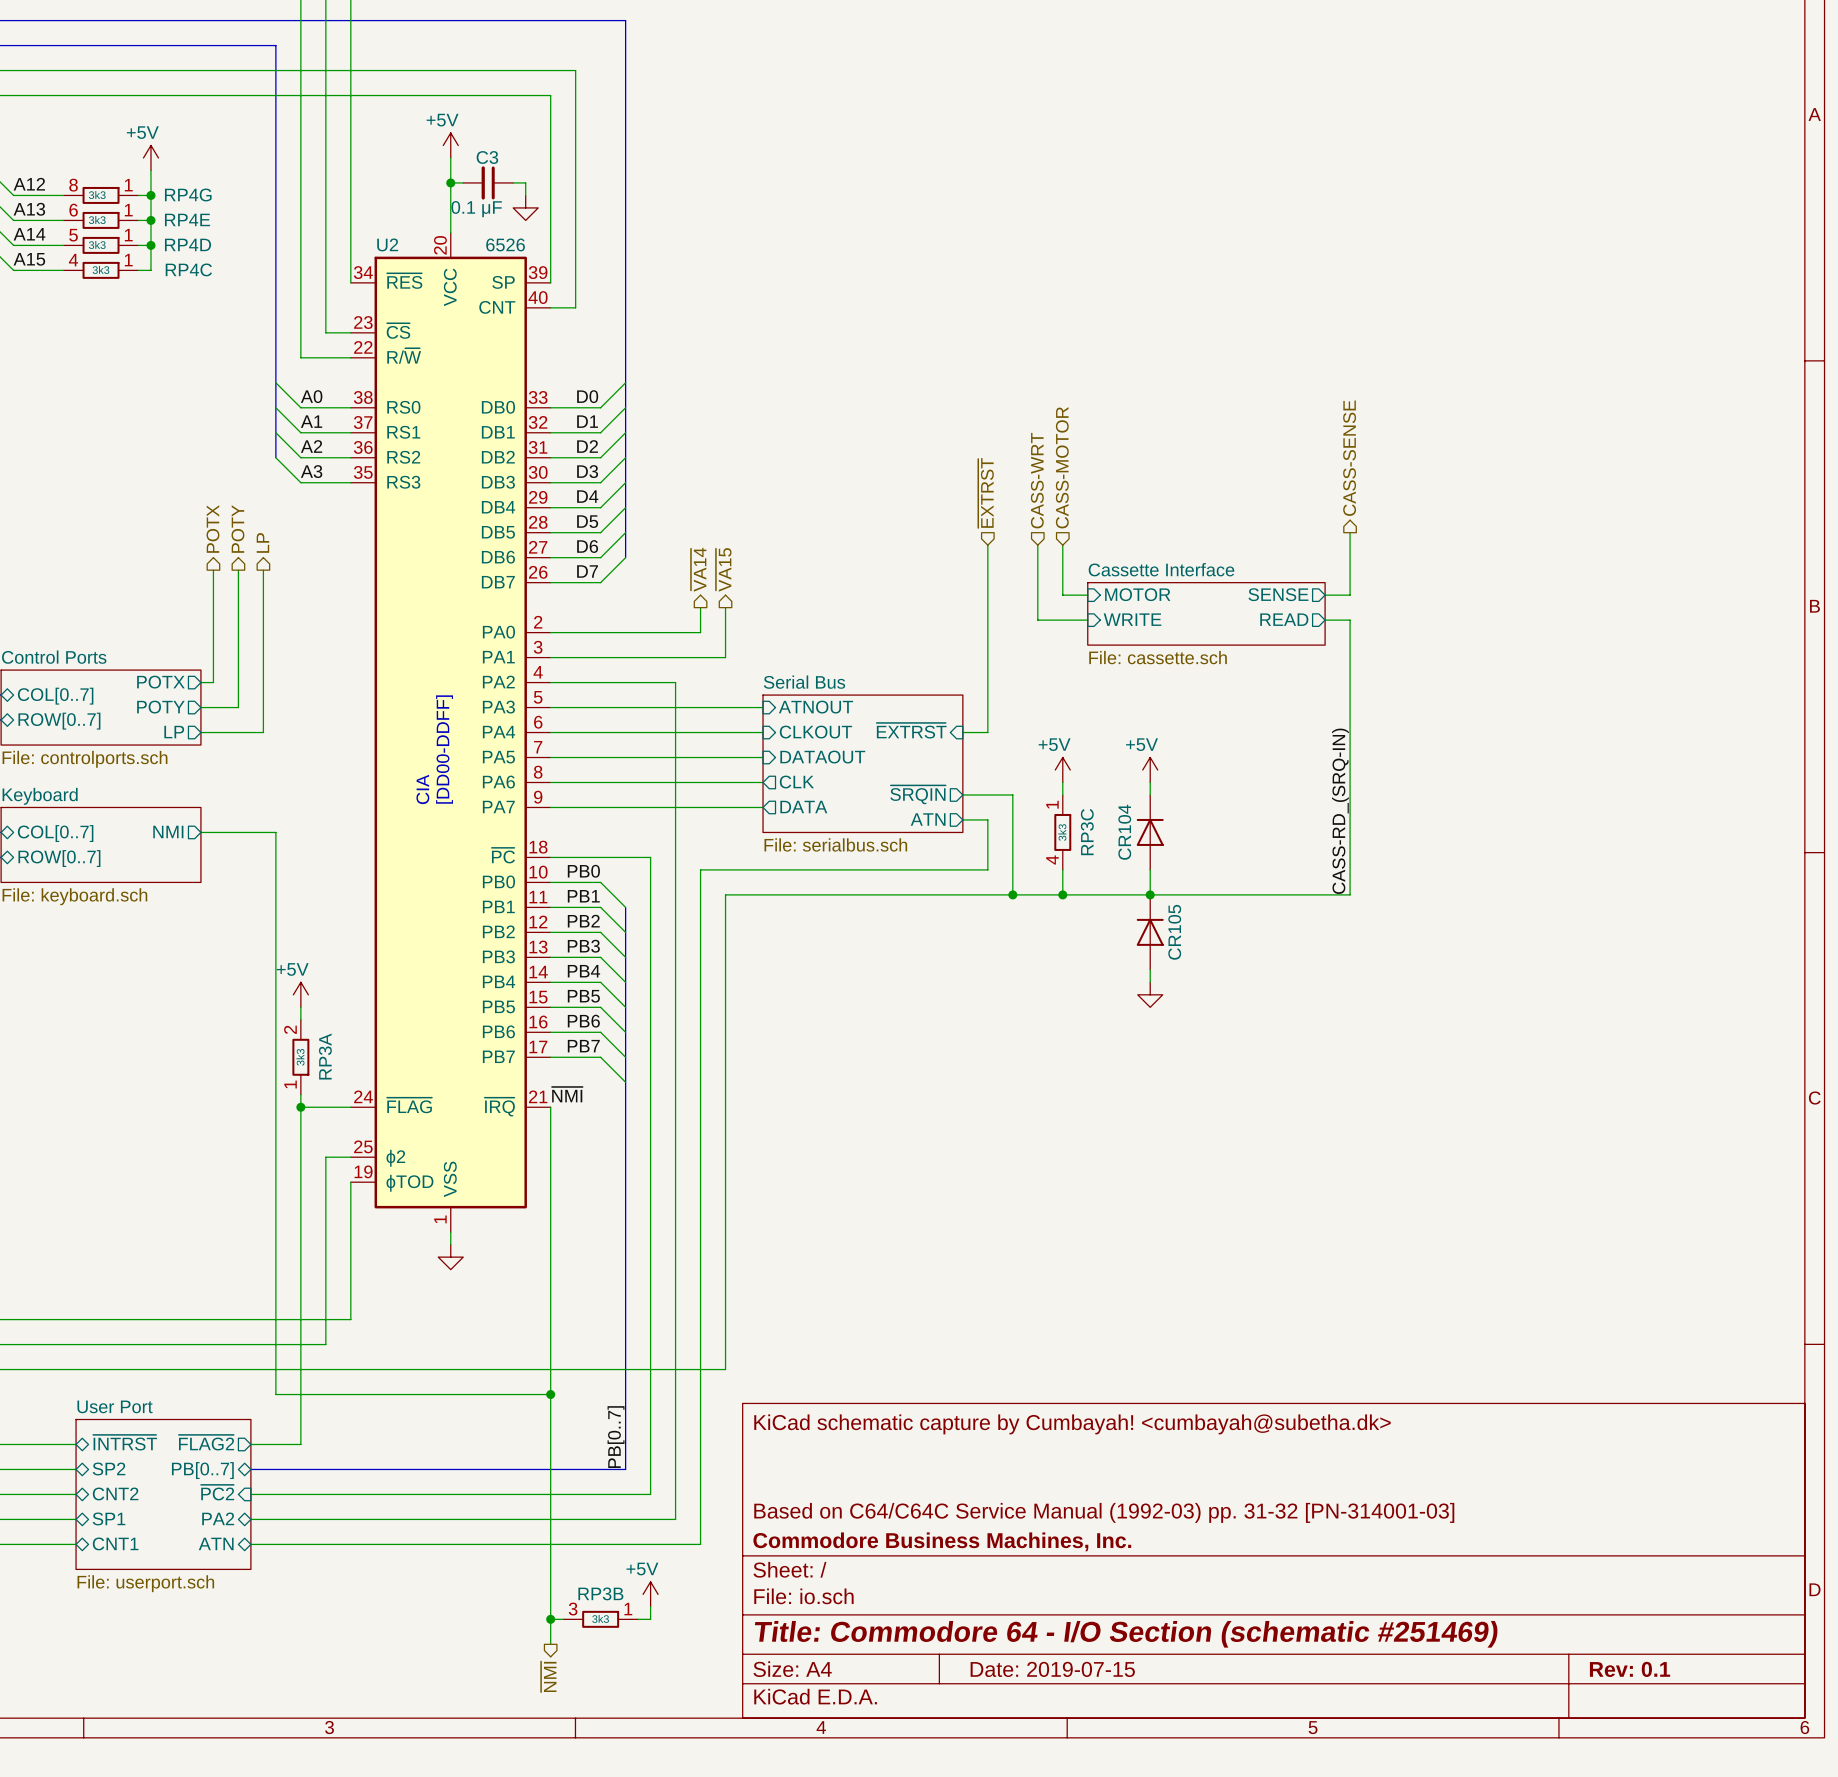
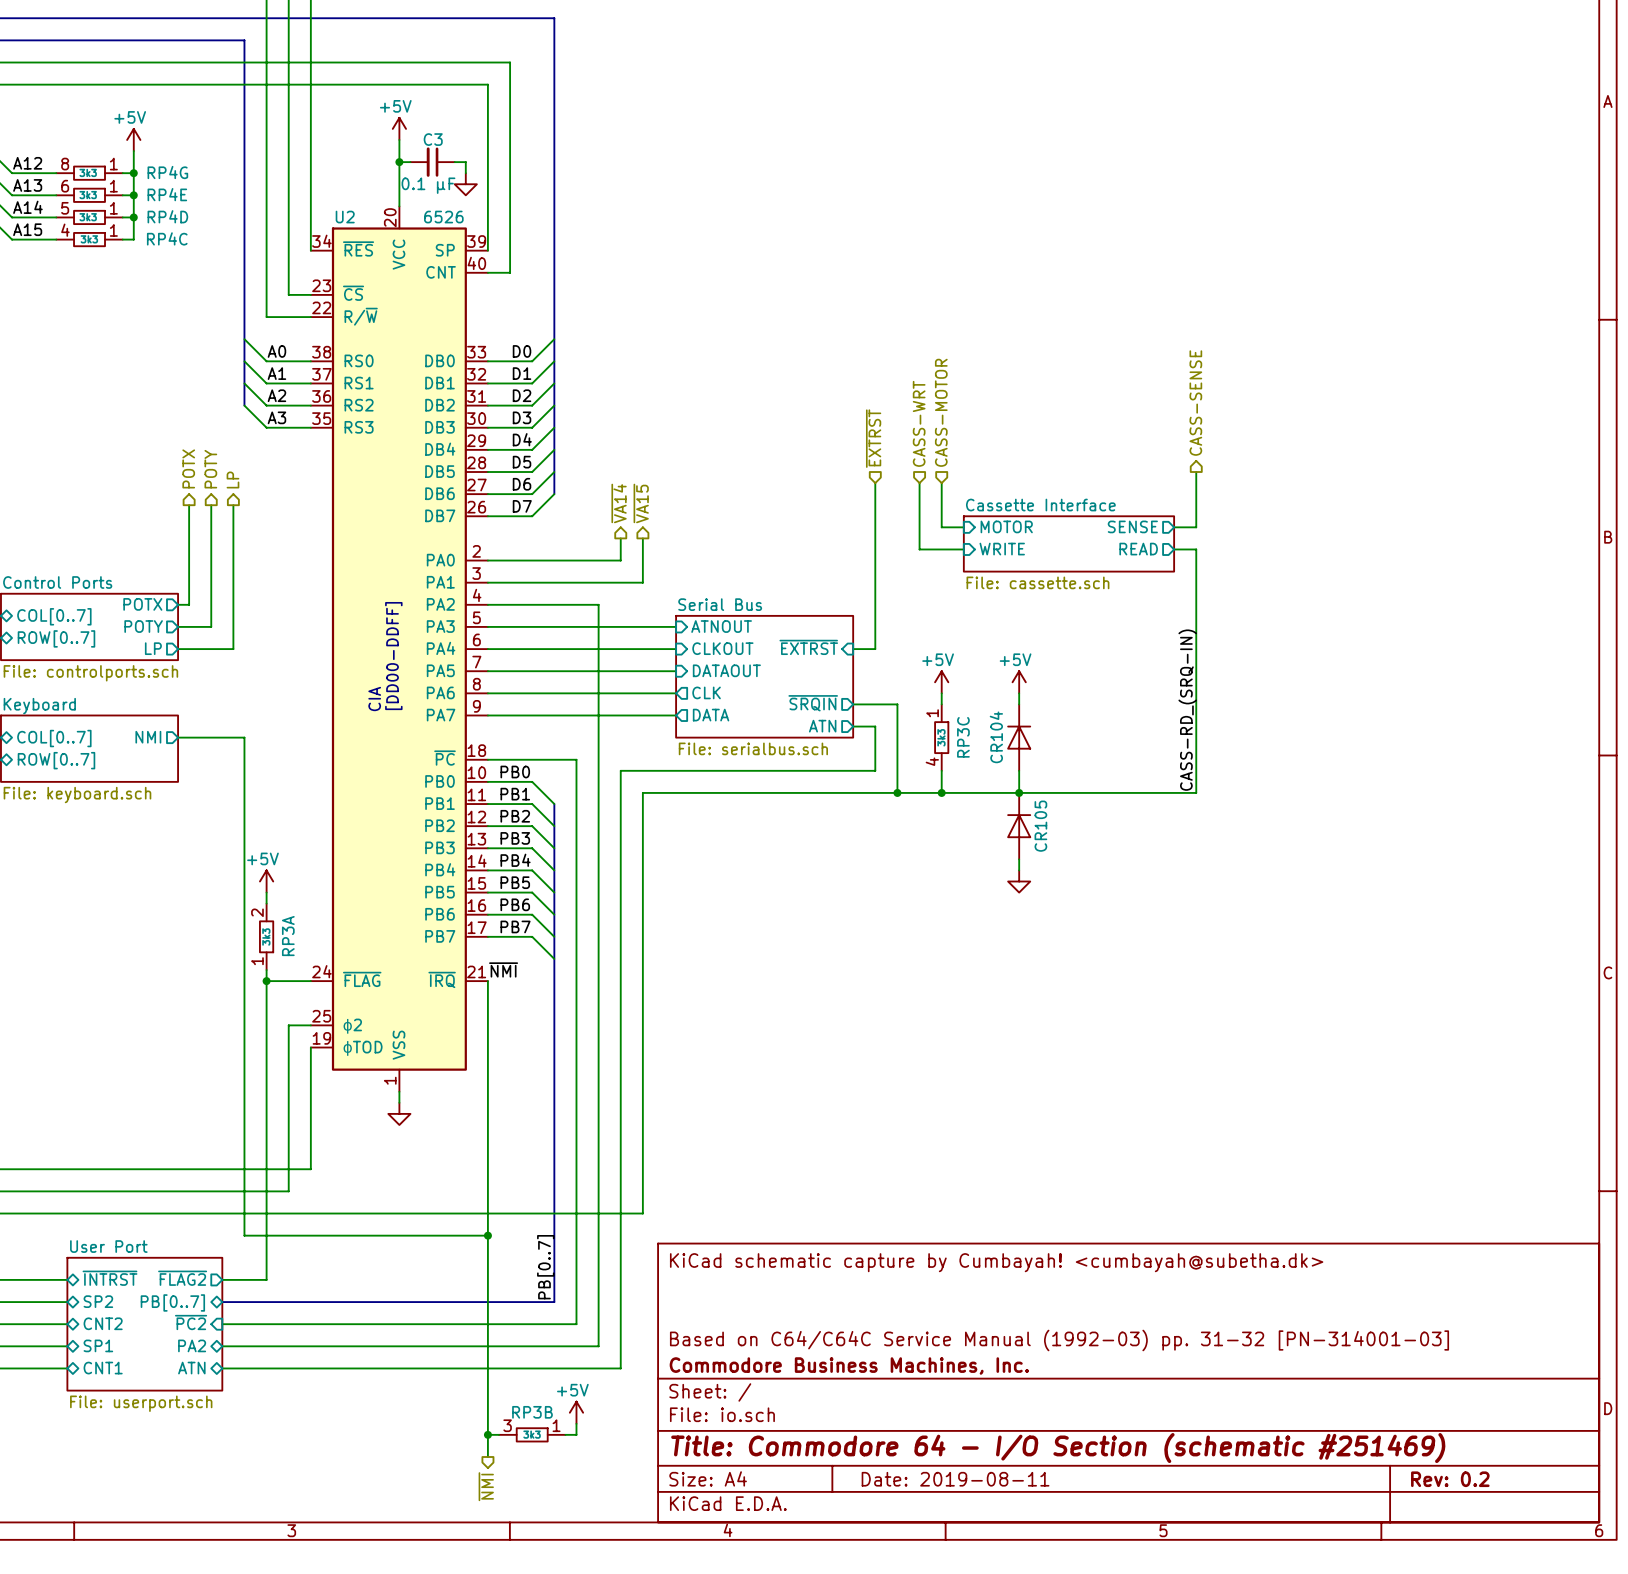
title block: Date: 2019-07-15 (1052, 1669) -> Date: 2019-08-11 (955, 1479)
title block: Rev: 0.1 (1630, 1669) -> Rev: 0.2 (1450, 1479)

